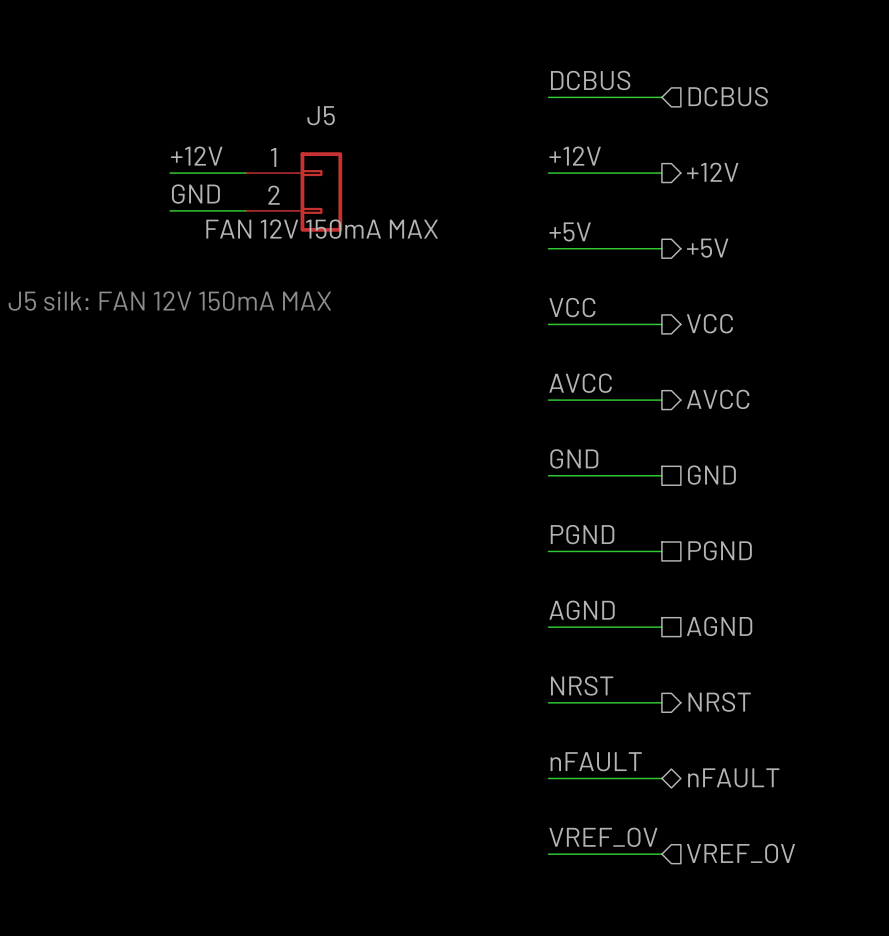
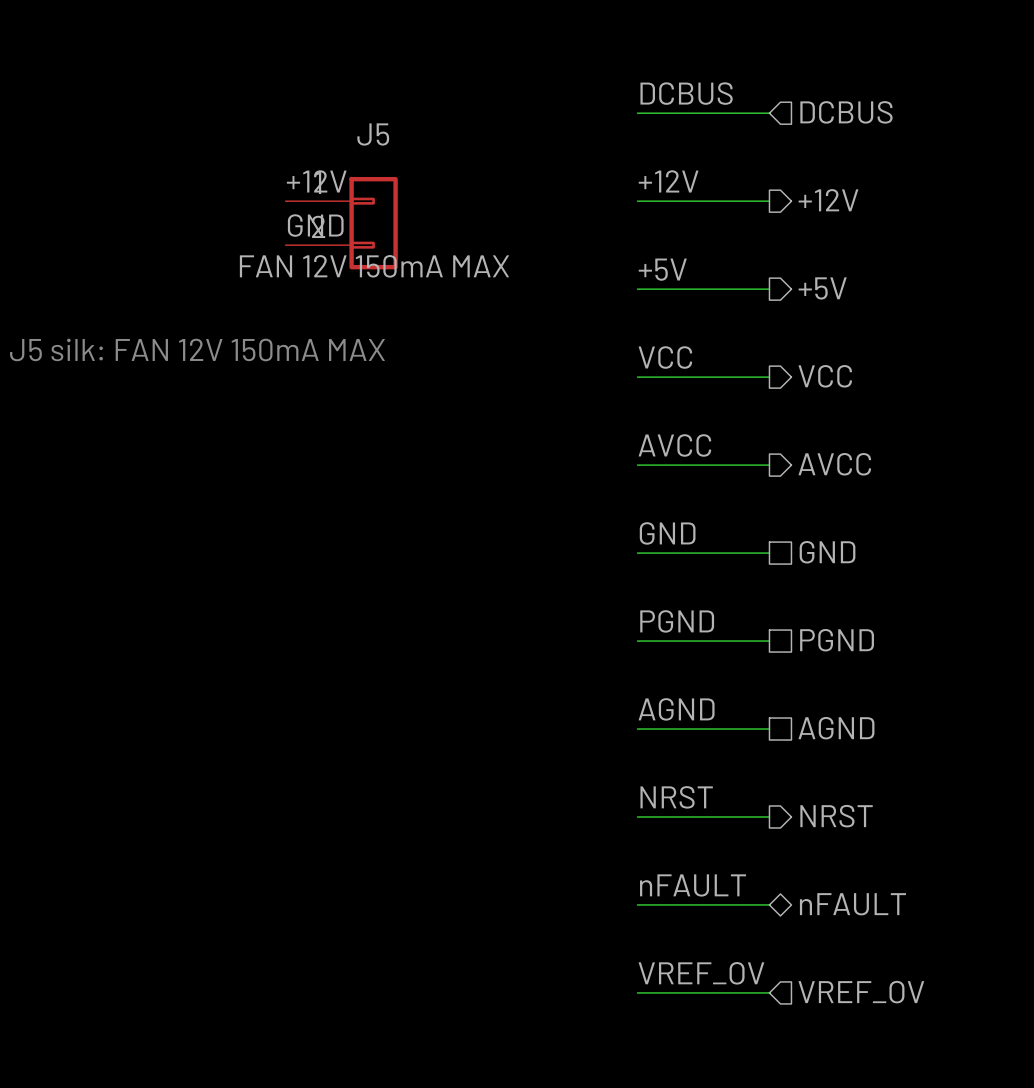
label position: +12V (196, 156) -> +12V (316, 181)
wire: (170, 173) (245, 173) -> none
label position: GND (195, 194) -> GND (315, 225)
wire: (170, 210) (245, 210) -> none

